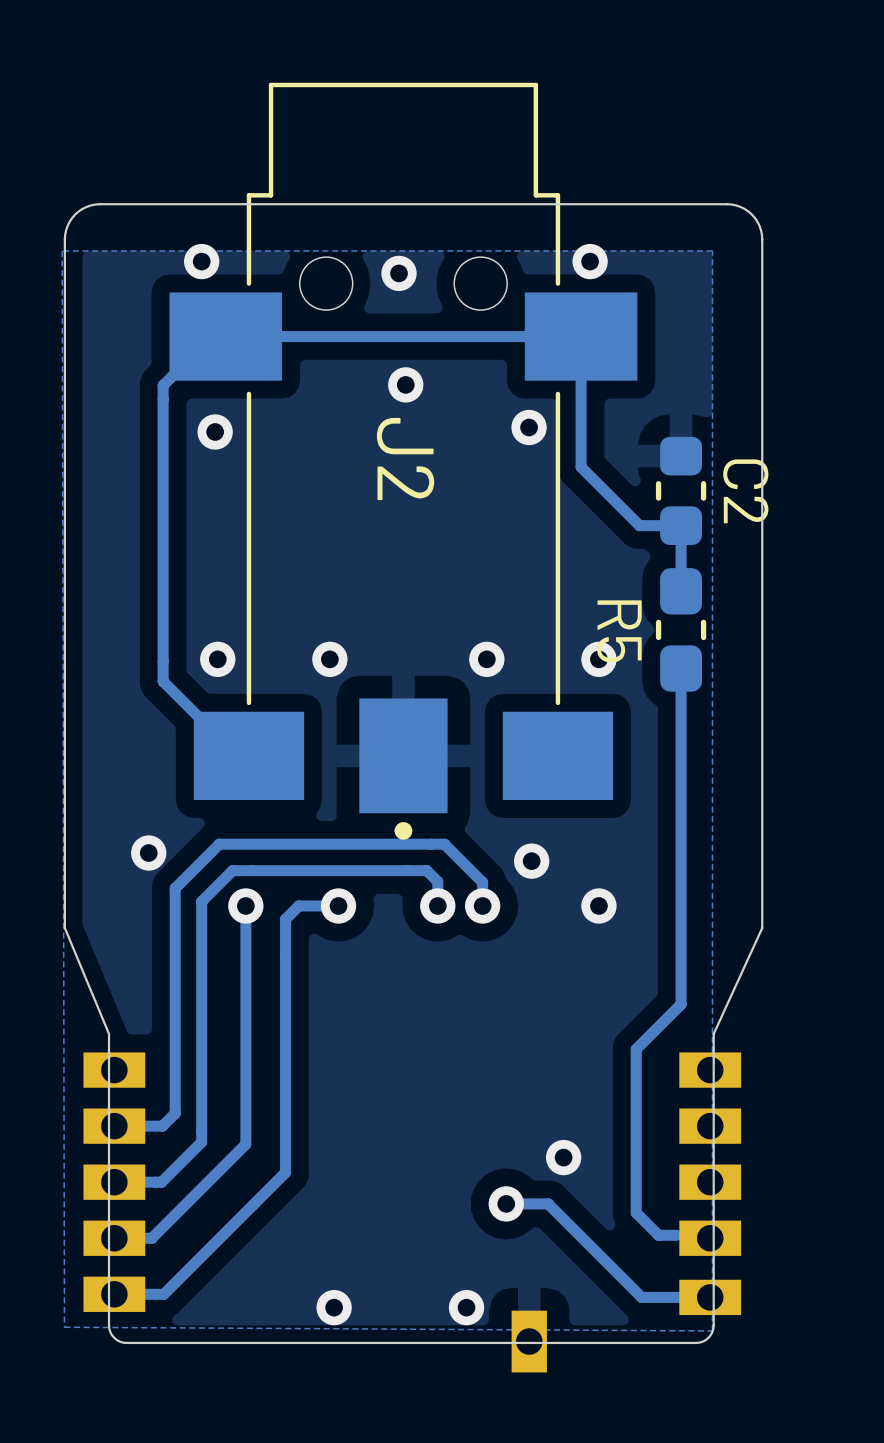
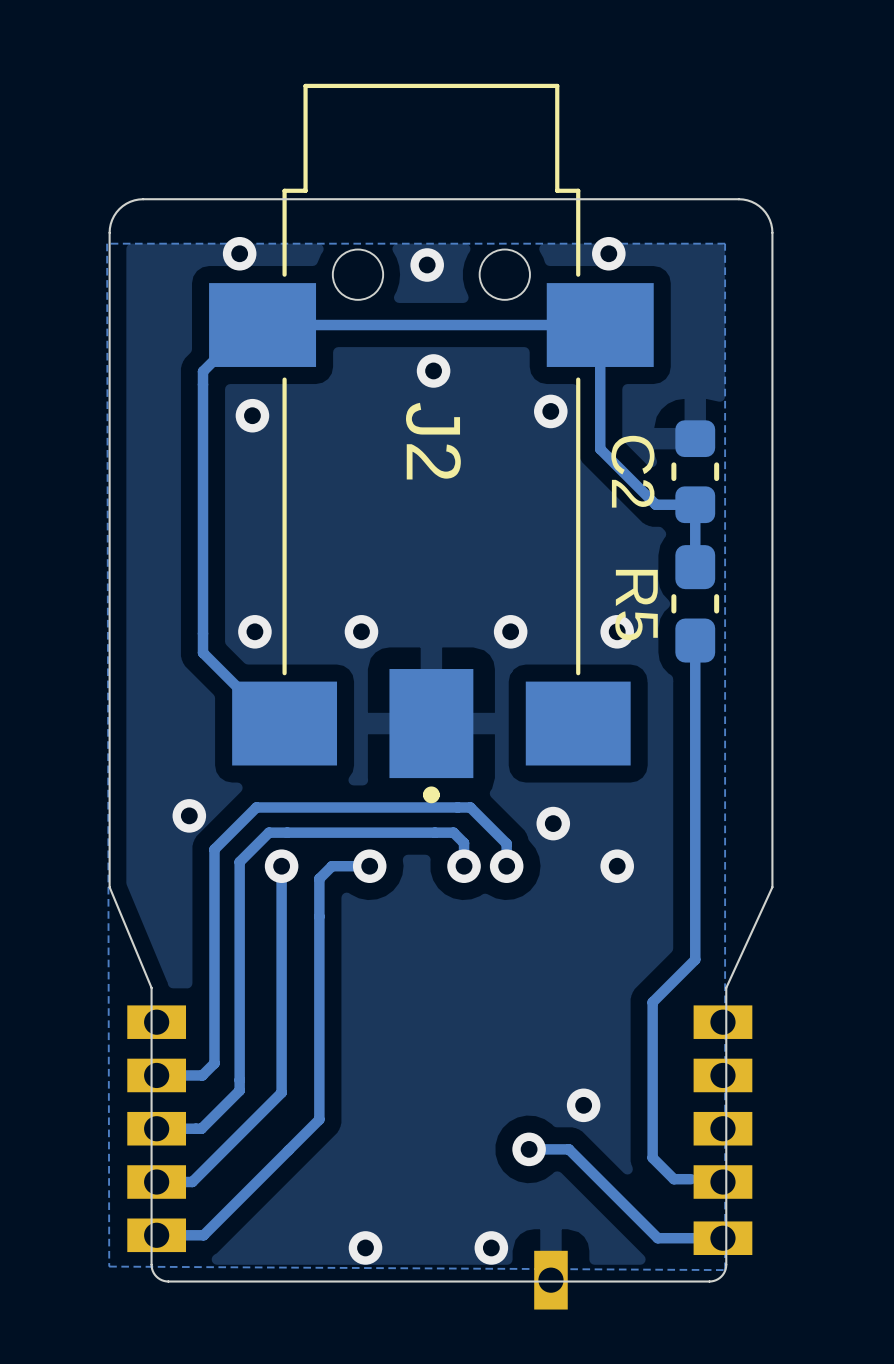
C2 name position: C2 (745, 491) -> C2 (632, 471)

